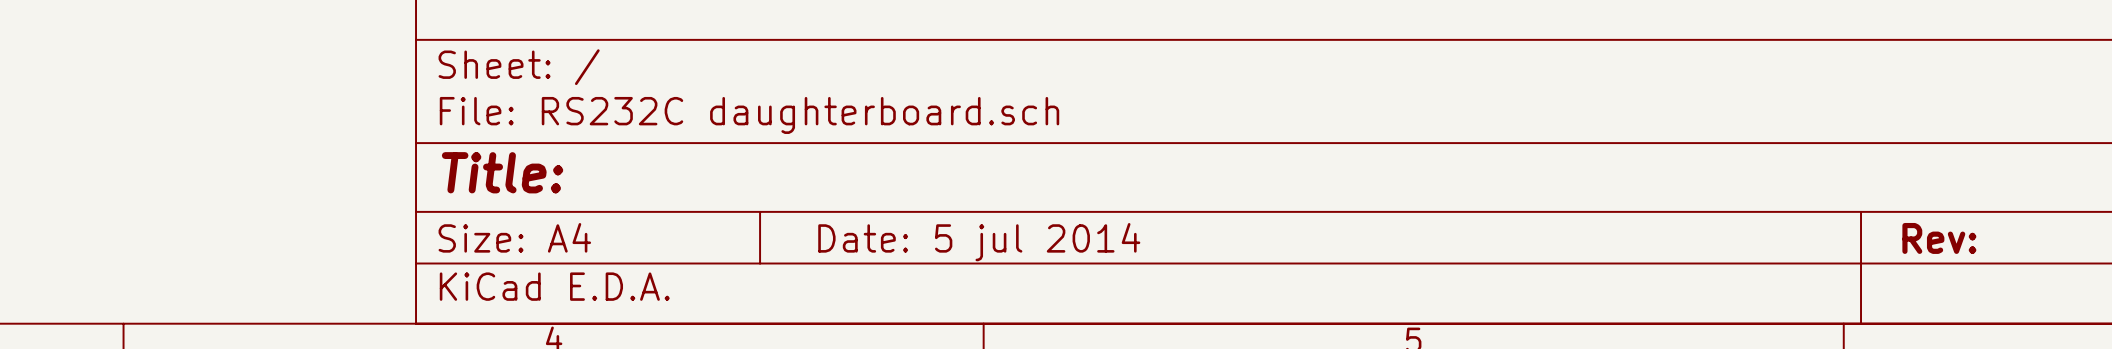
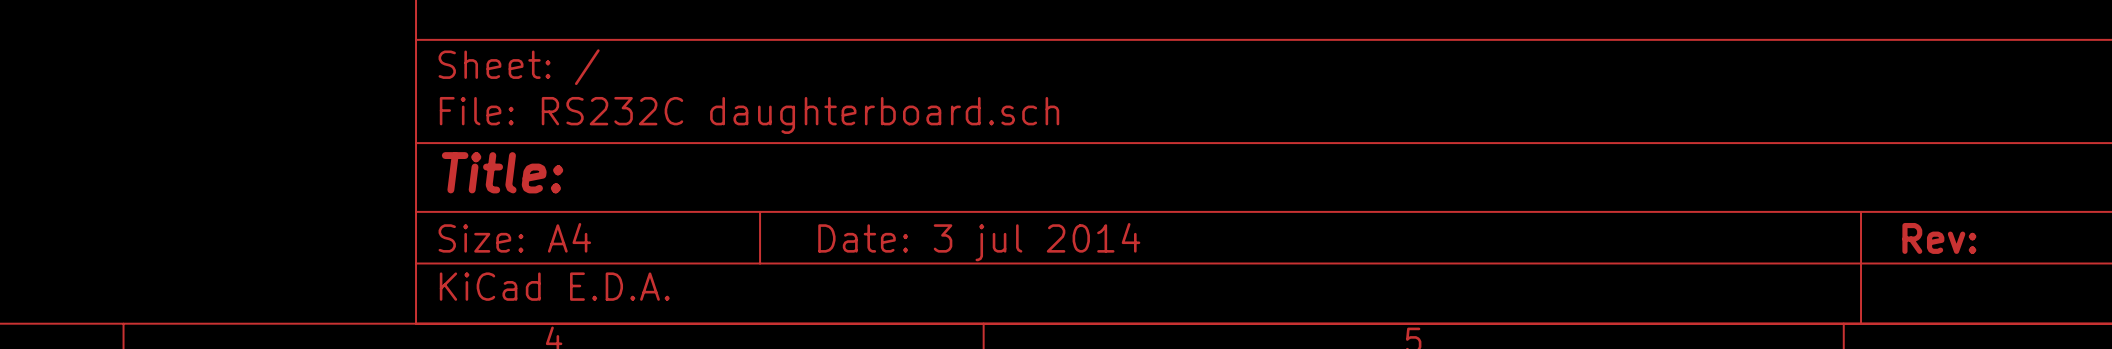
title block: Date: 5 jul 2014 (979, 242) -> Date: 3 jul 2014 (979, 242)

